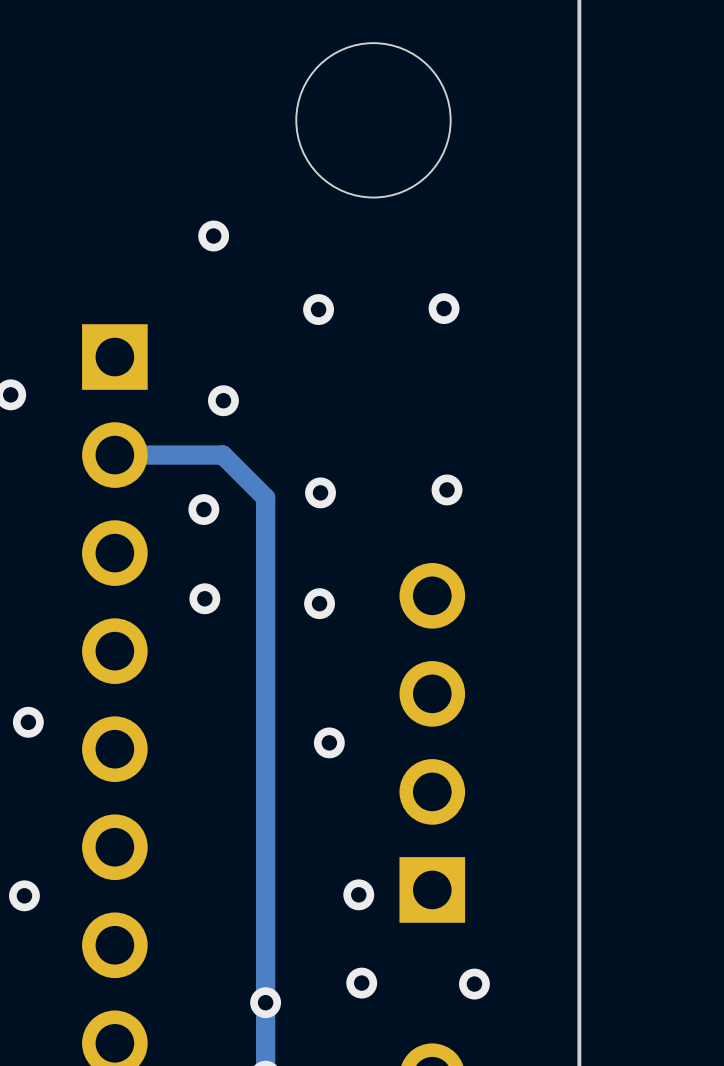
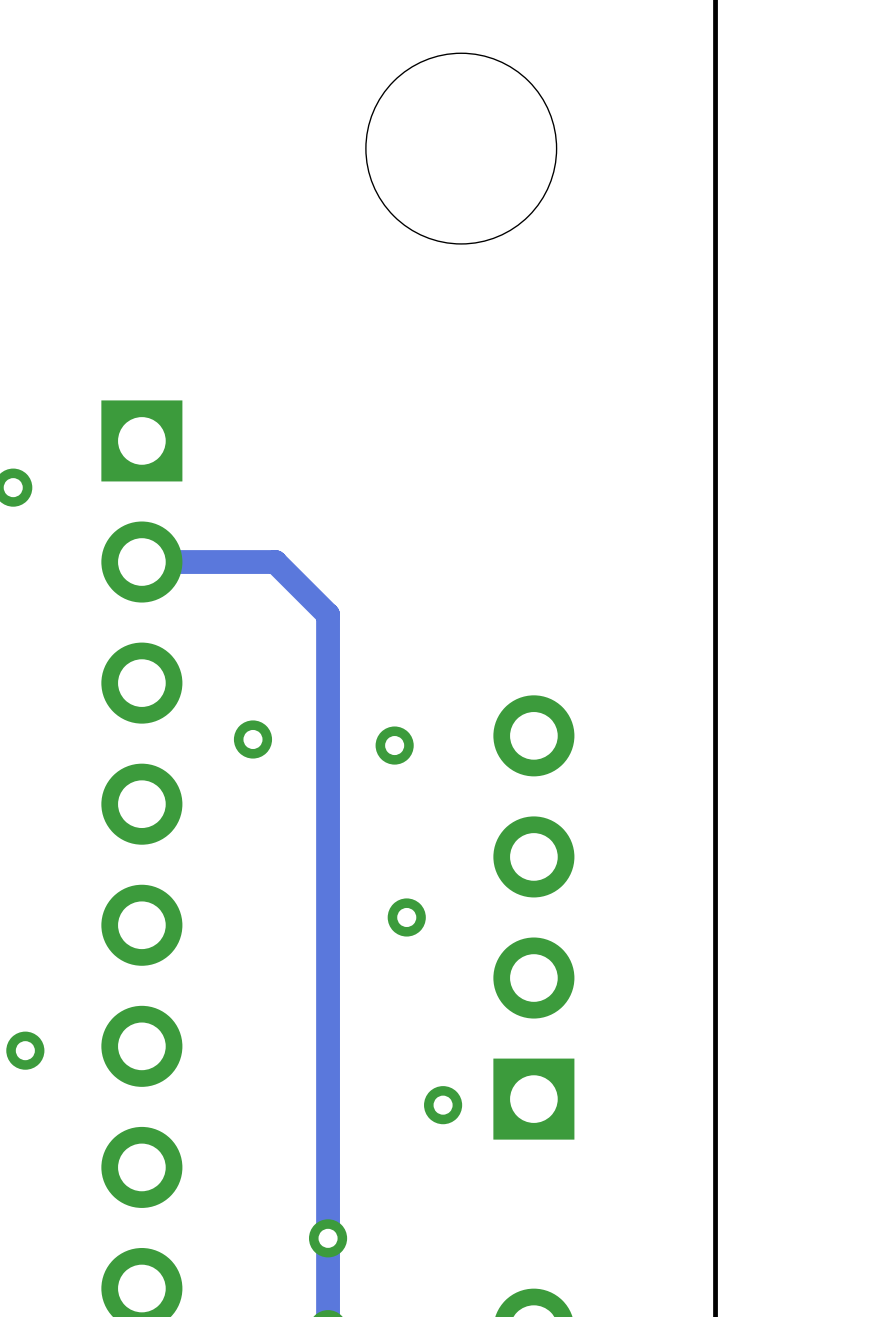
via: (213, 236) -> none
via: (444, 308) -> none
via: (318, 309) -> none
via: (223, 400) -> none
via: (447, 489) -> none
via: (320, 492) -> none
via: (203, 509) -> none
via: (28, 722) -> none
via position: (24, 895) -> (25, 1050)
via: (361, 983) -> none
via: (474, 984) -> none

